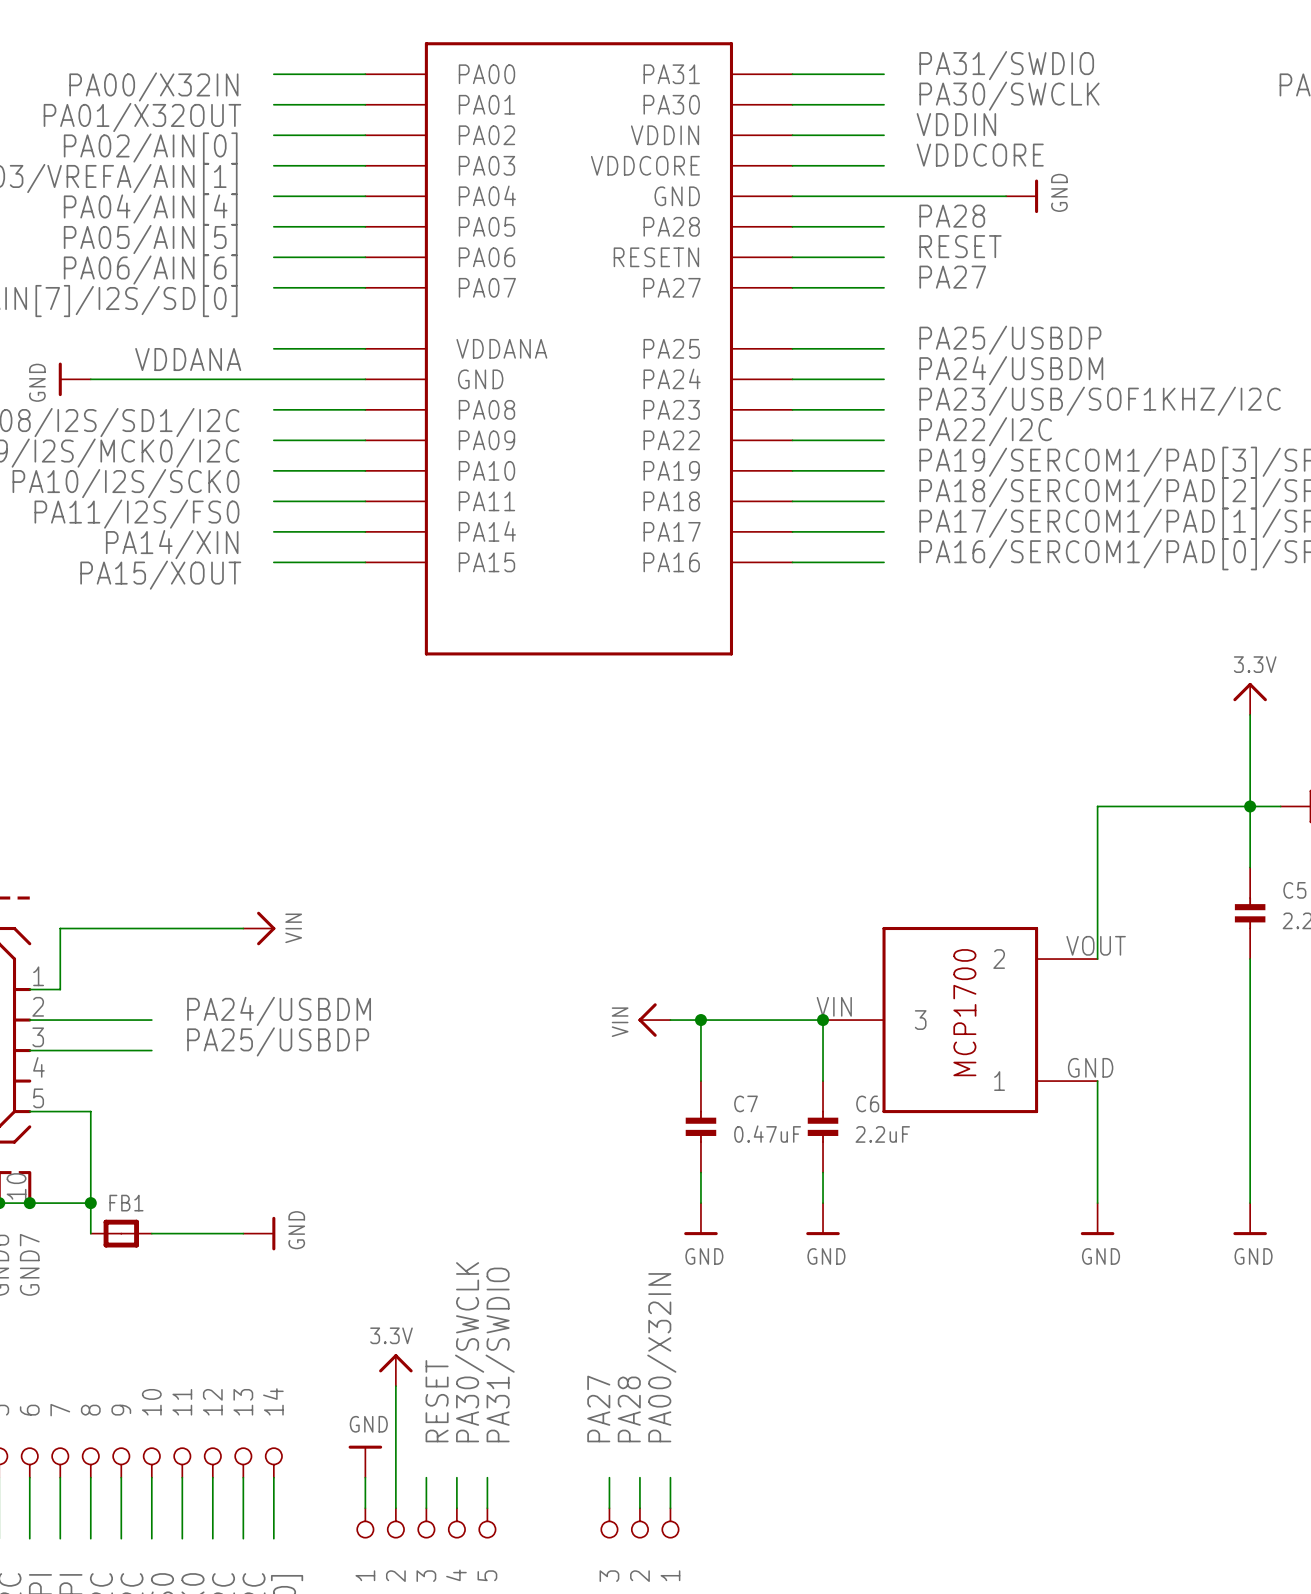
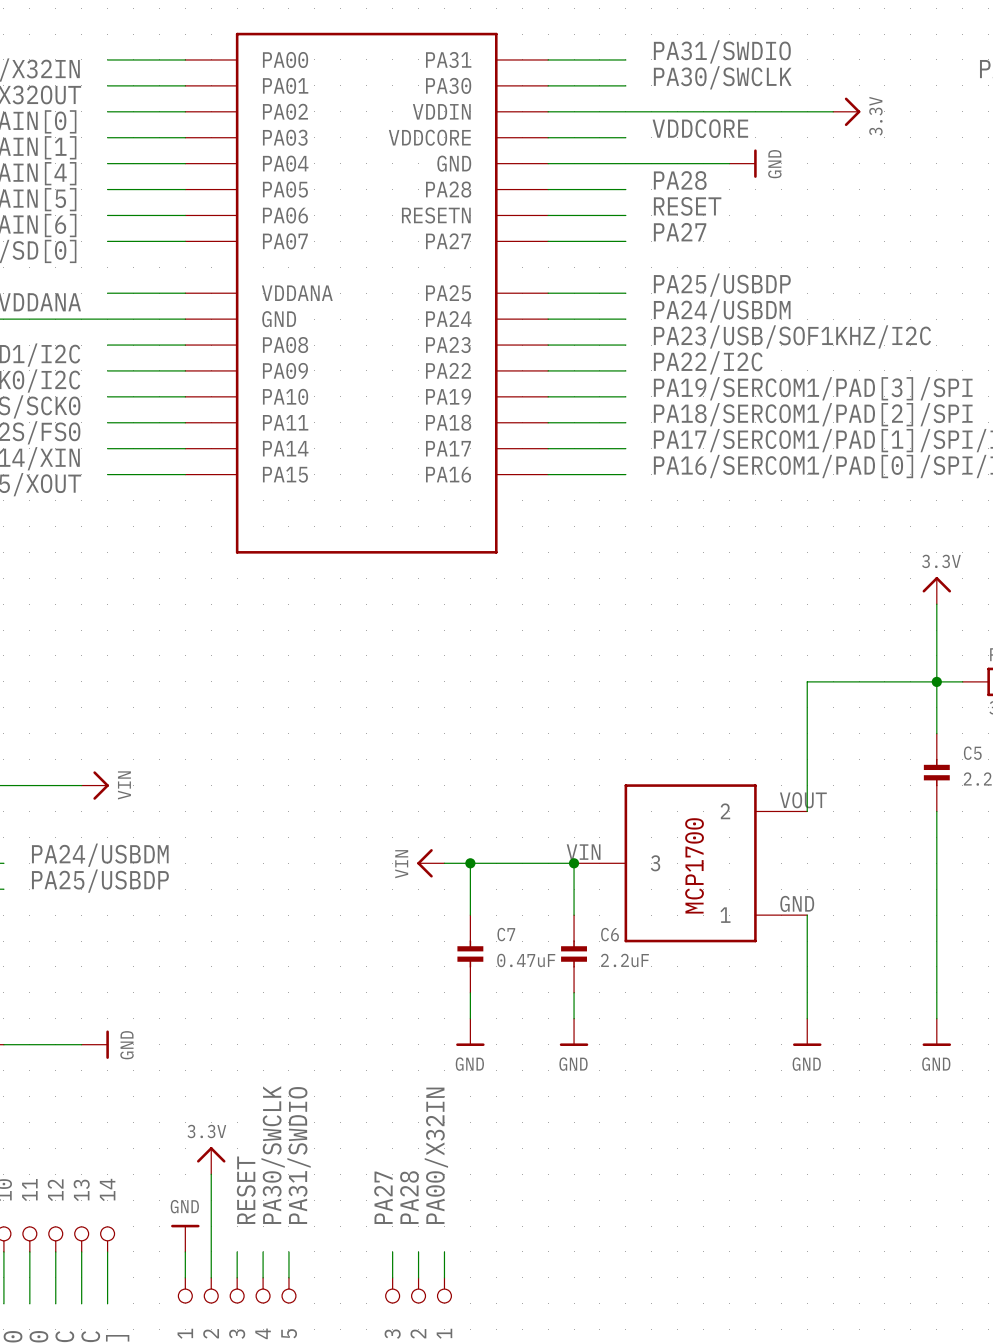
label: VDDIN (956, 124) -> none
wire: none -> (625, 111) (833, 111)
power symbol: none -> 3.3V (846, 111)

